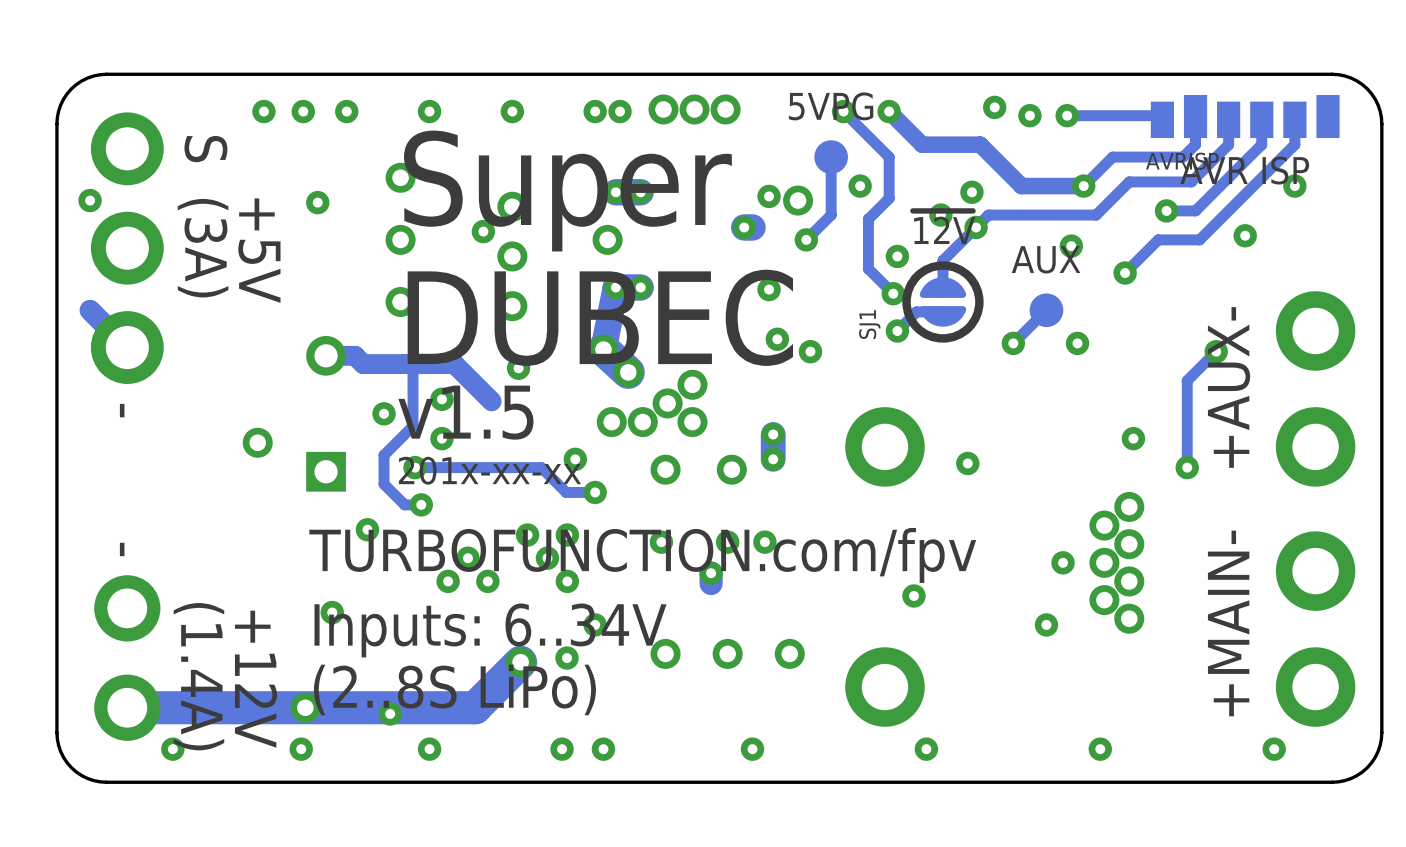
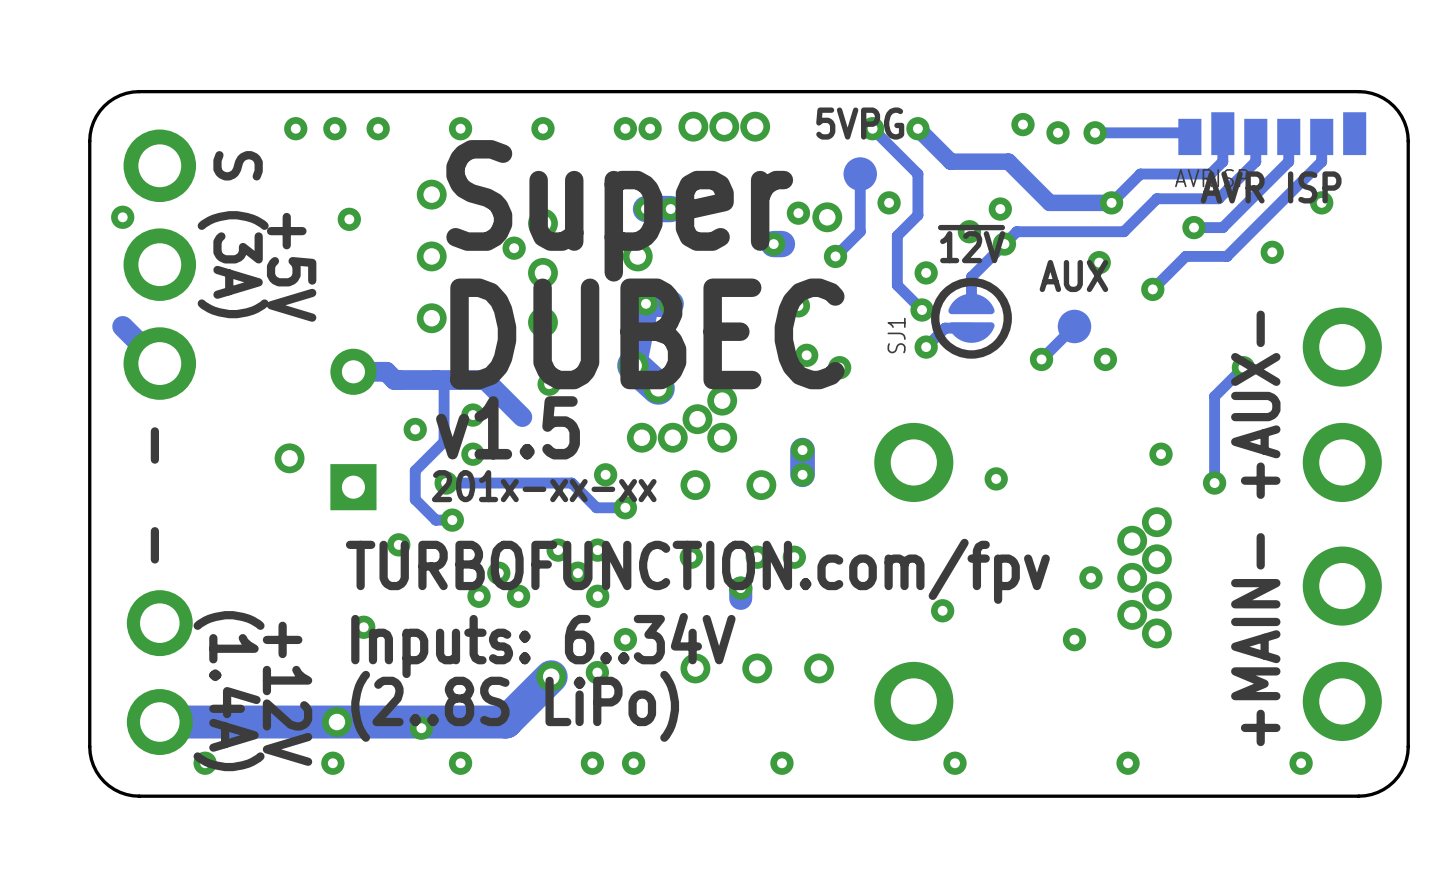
part footprint: [306, 335, 346, 492] -> [330, 348, 377, 511]

